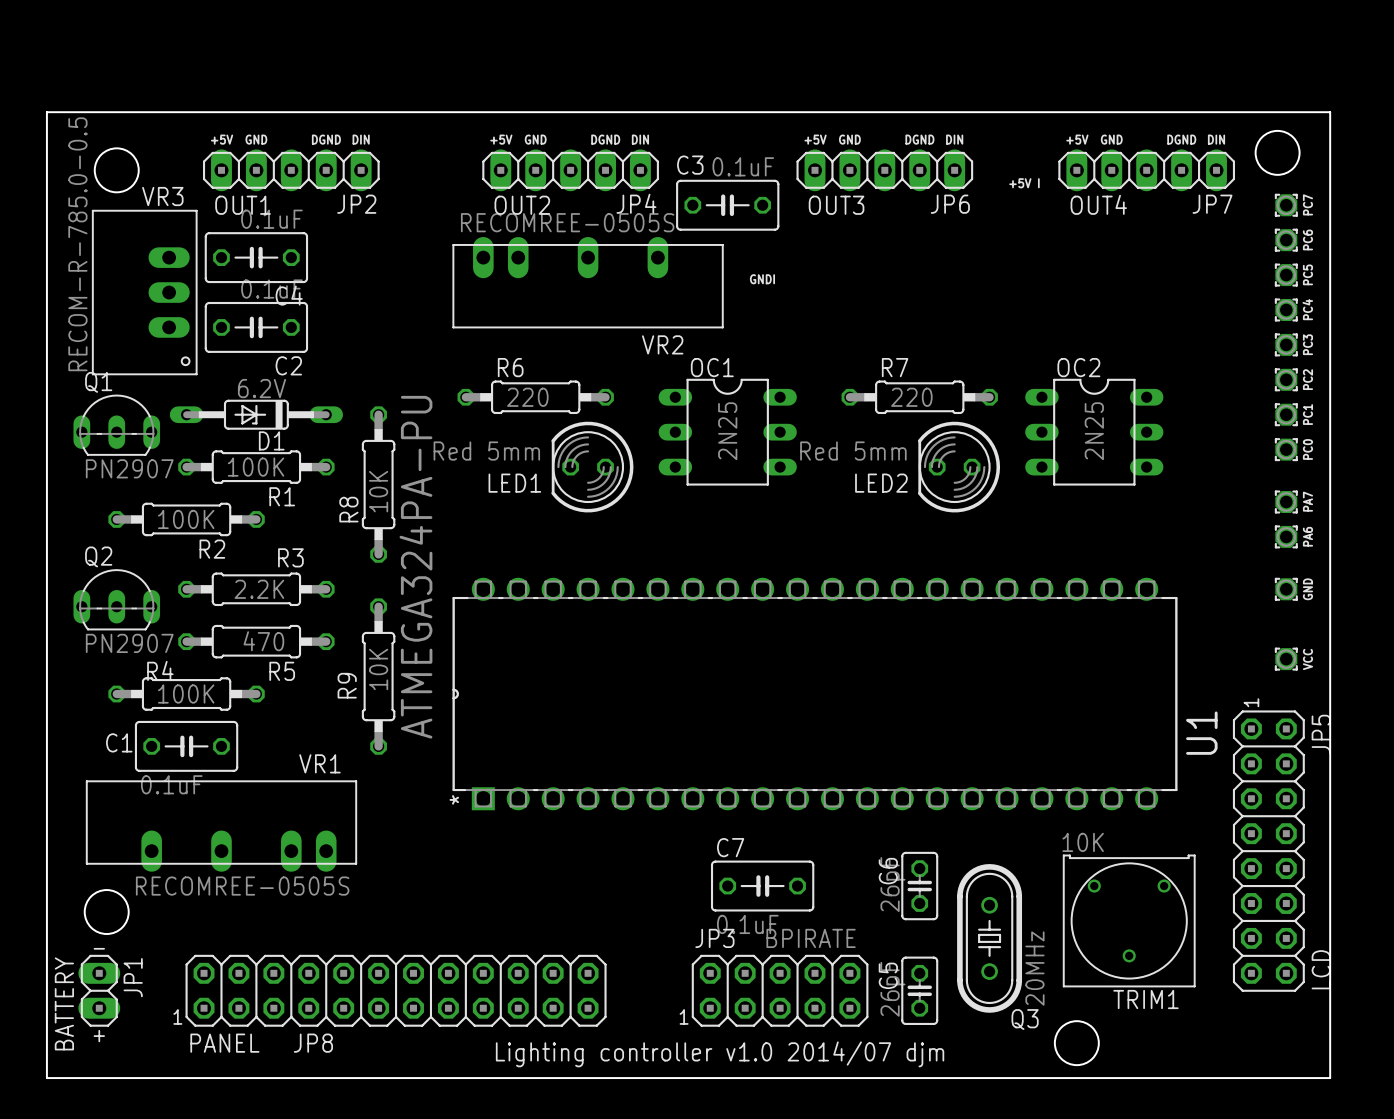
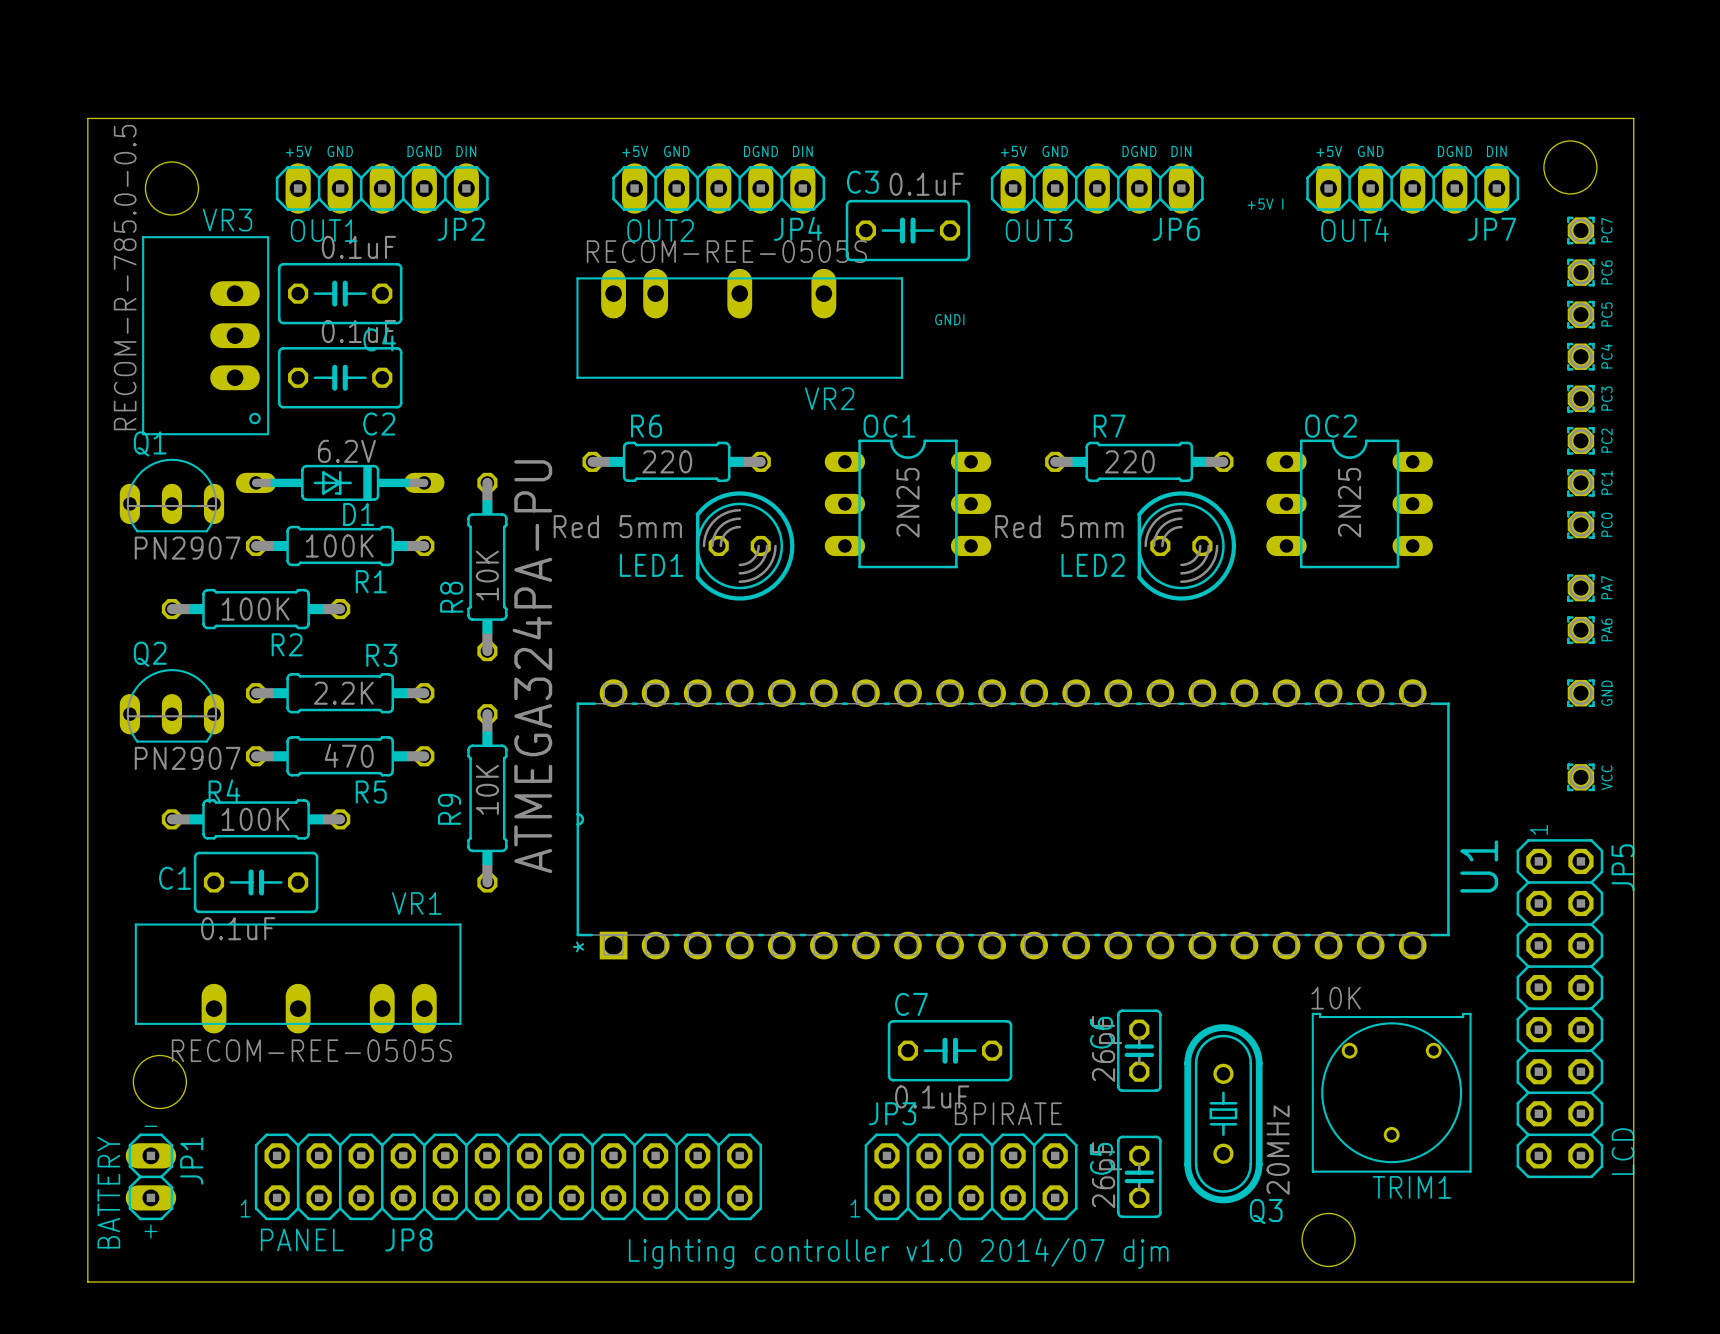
VR2 value: RECOMREE-0505S (567, 222) -> RECOM-REE-0505S (726, 251)
VR1 value: RECOMREE-0505S (242, 886) -> RECOM-REE-0505S (311, 1050)

